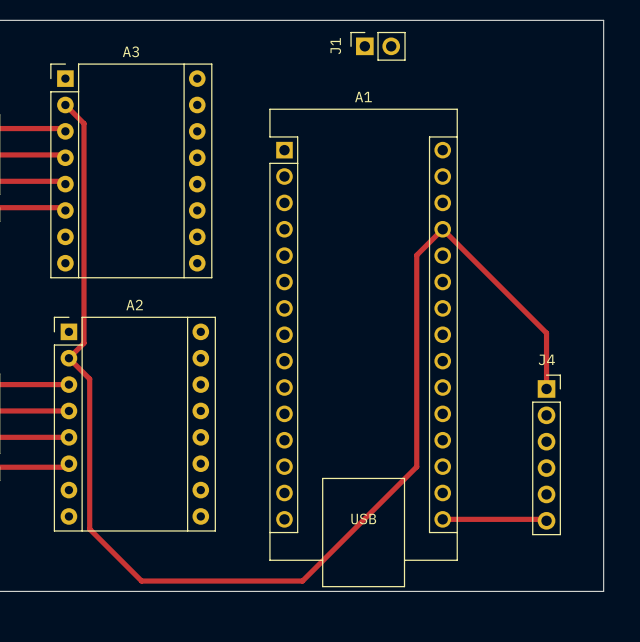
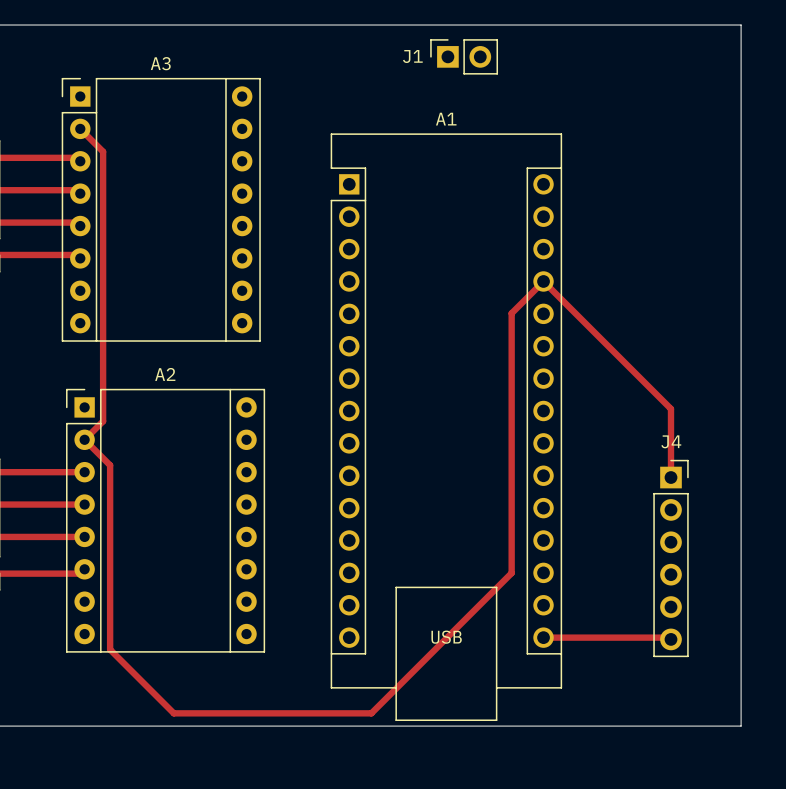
J1 name rotation: 0° (335, 46) -> 90° clockwise (412, 56)

